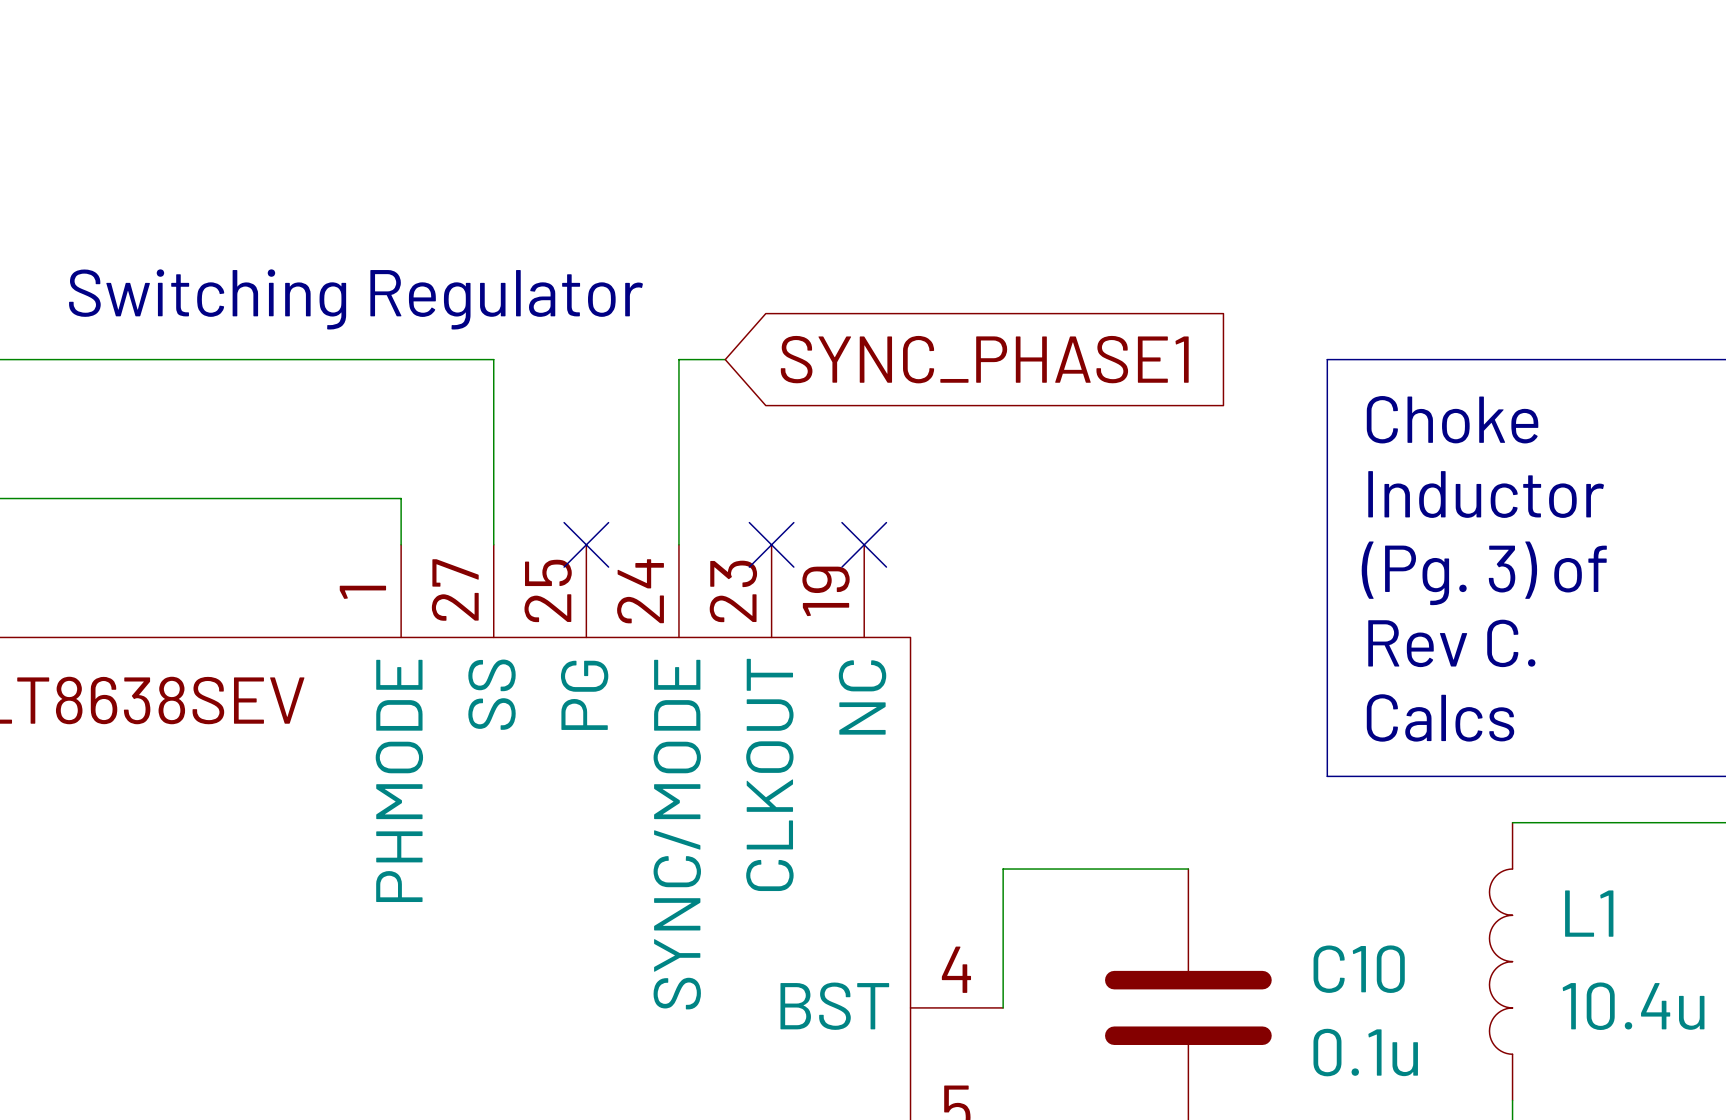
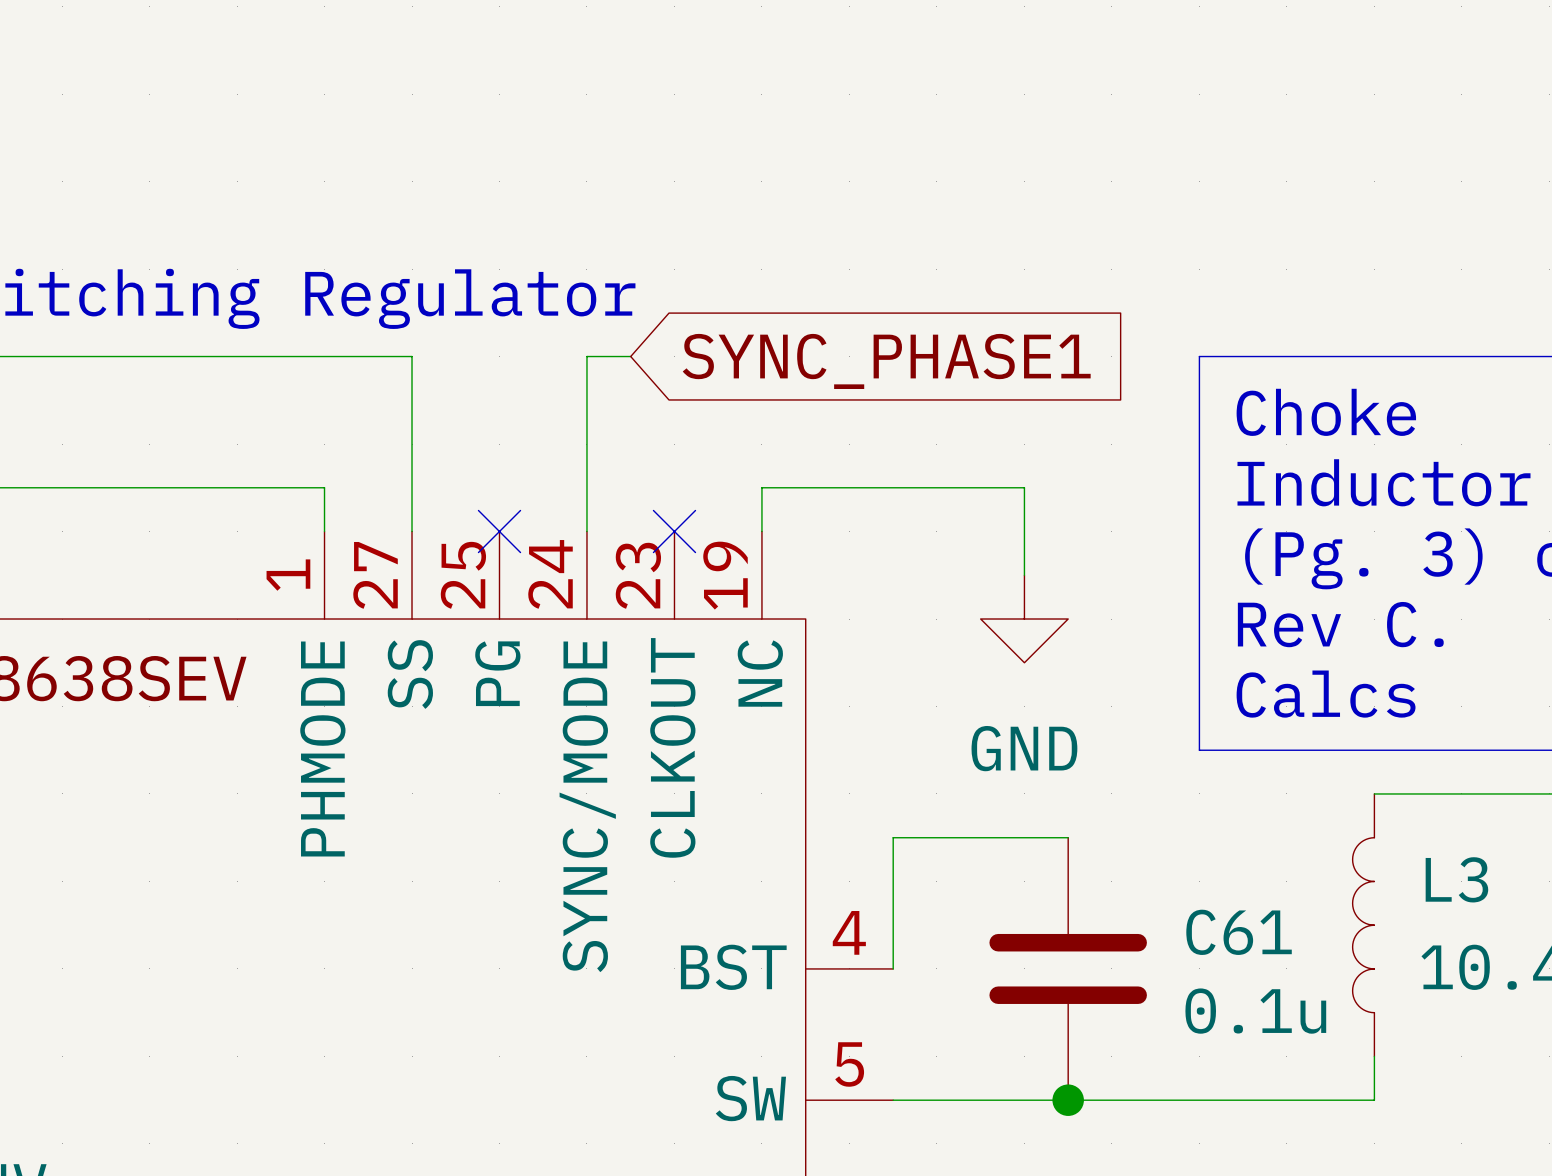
wire: none -> (761, 531) (761, 487) (1024, 487) (1024, 575)
no-connect mark: (864, 544) -> none
power symbol: none -> GND (1024, 619)
L1 name: L1 (1589, 913) -> L3 (1456, 879)
C10 name: C10 (1359, 969) -> C61 (1239, 932)

